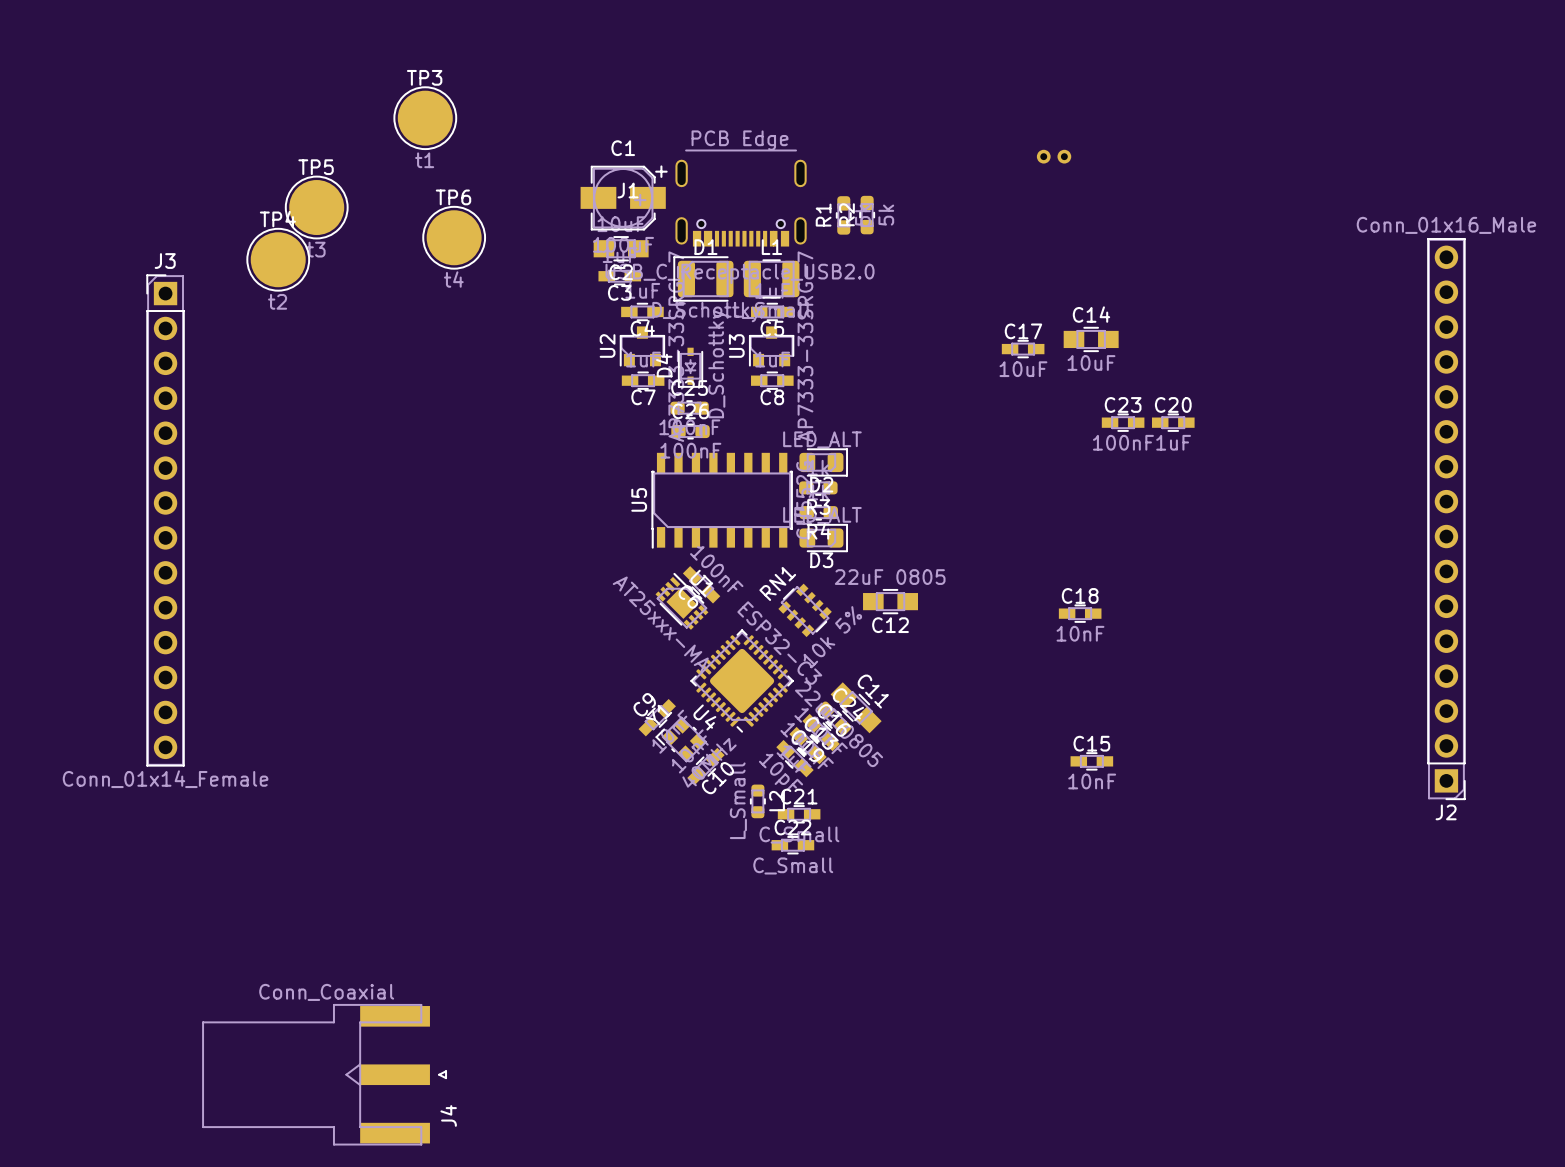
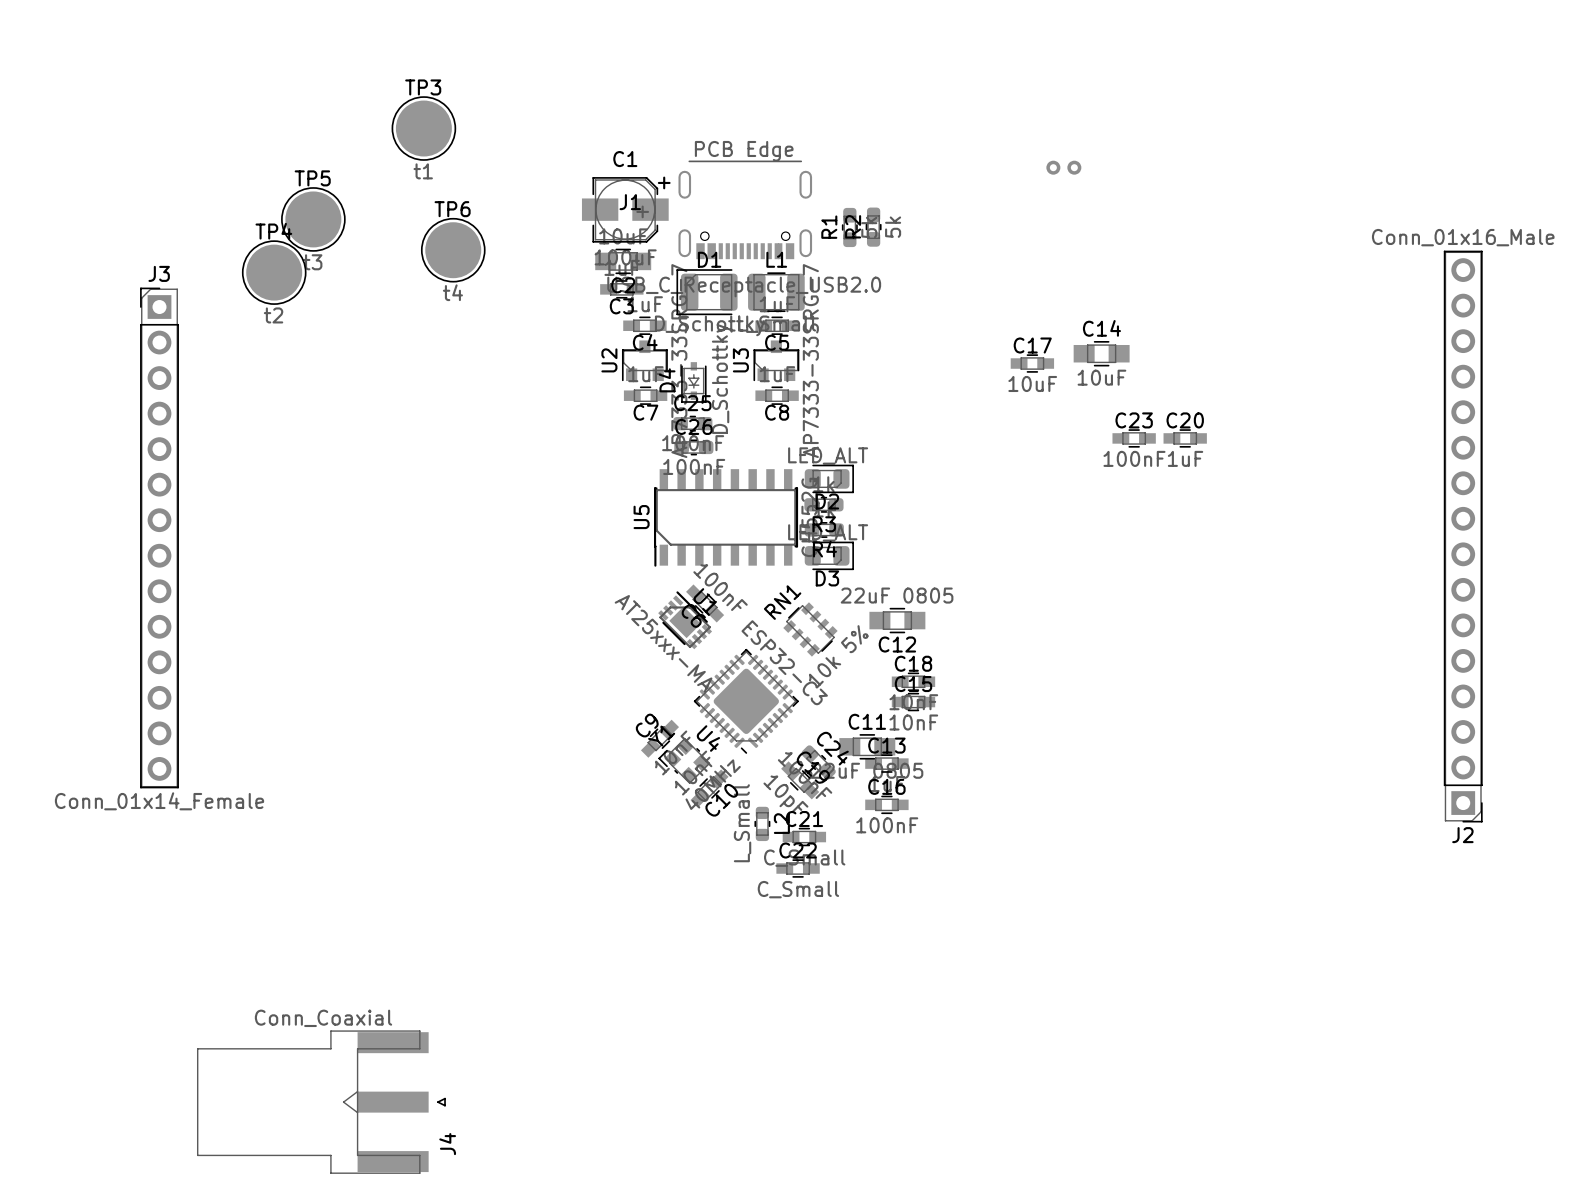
C18 position: (1080, 613) -> (913, 681)
C11 rotation: 0° (856, 707) -> 45° counterclockwise (867, 746)
C24 position: (834, 718) -> (818, 762)
C16 rotation: 0° (821, 732) -> 45° counterclockwise (886, 804)
C16 position: (821, 732) -> (886, 804)
C13 rotation: 0° (808, 745) -> 45° counterclockwise (886, 763)
C13 position: (808, 745) -> (886, 763)
C15 position: (1091, 761) -> (913, 702)

